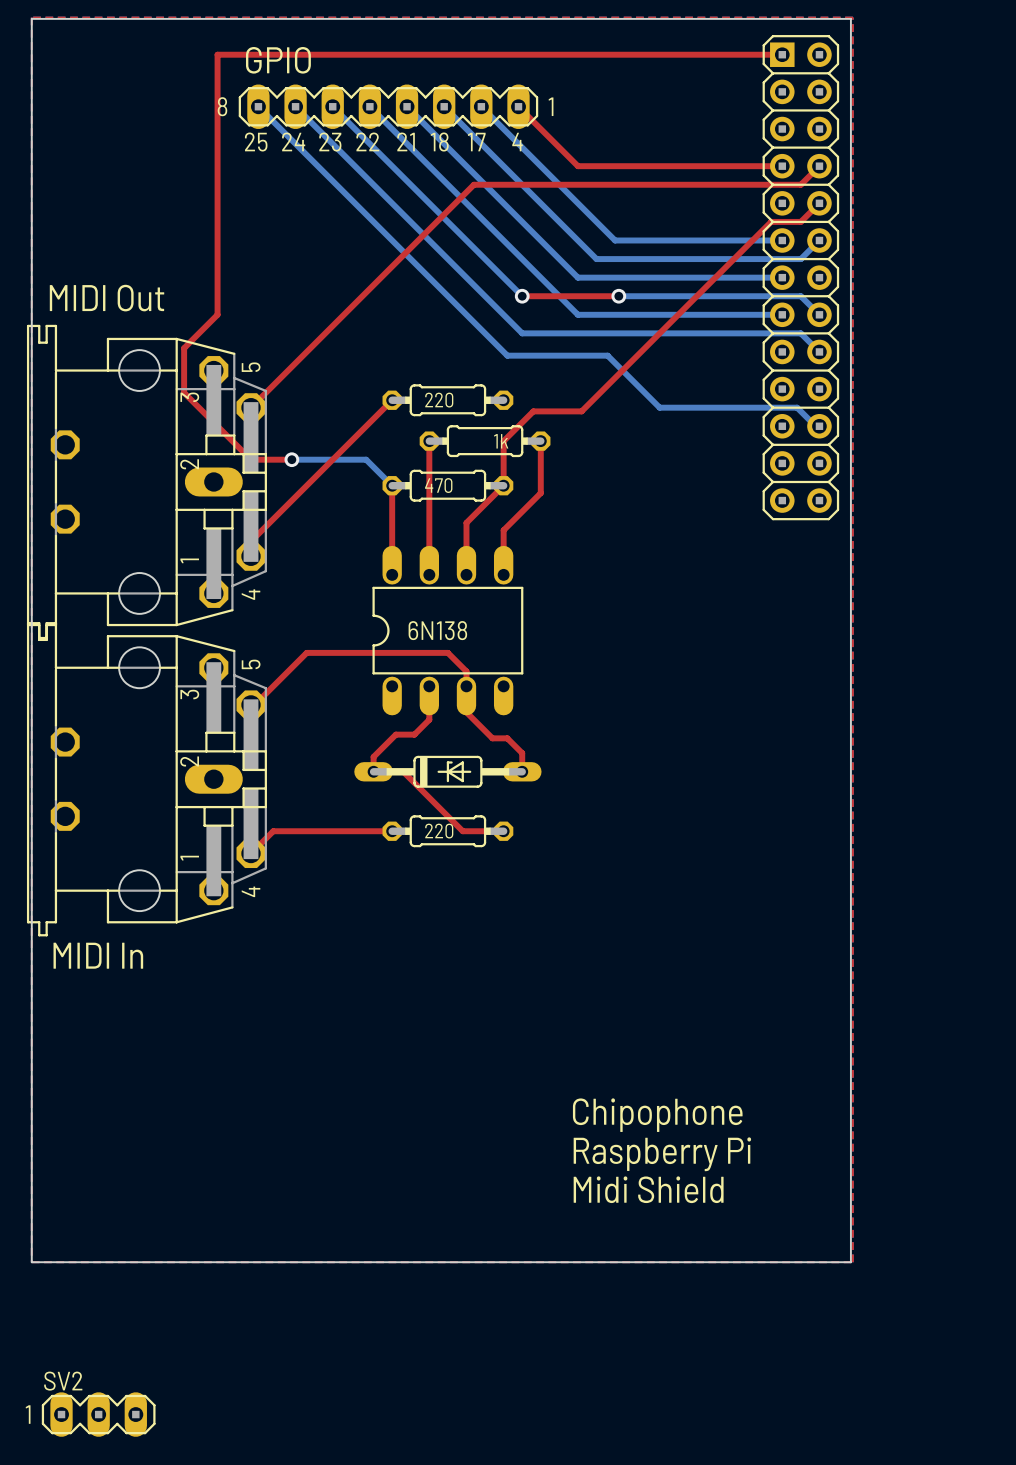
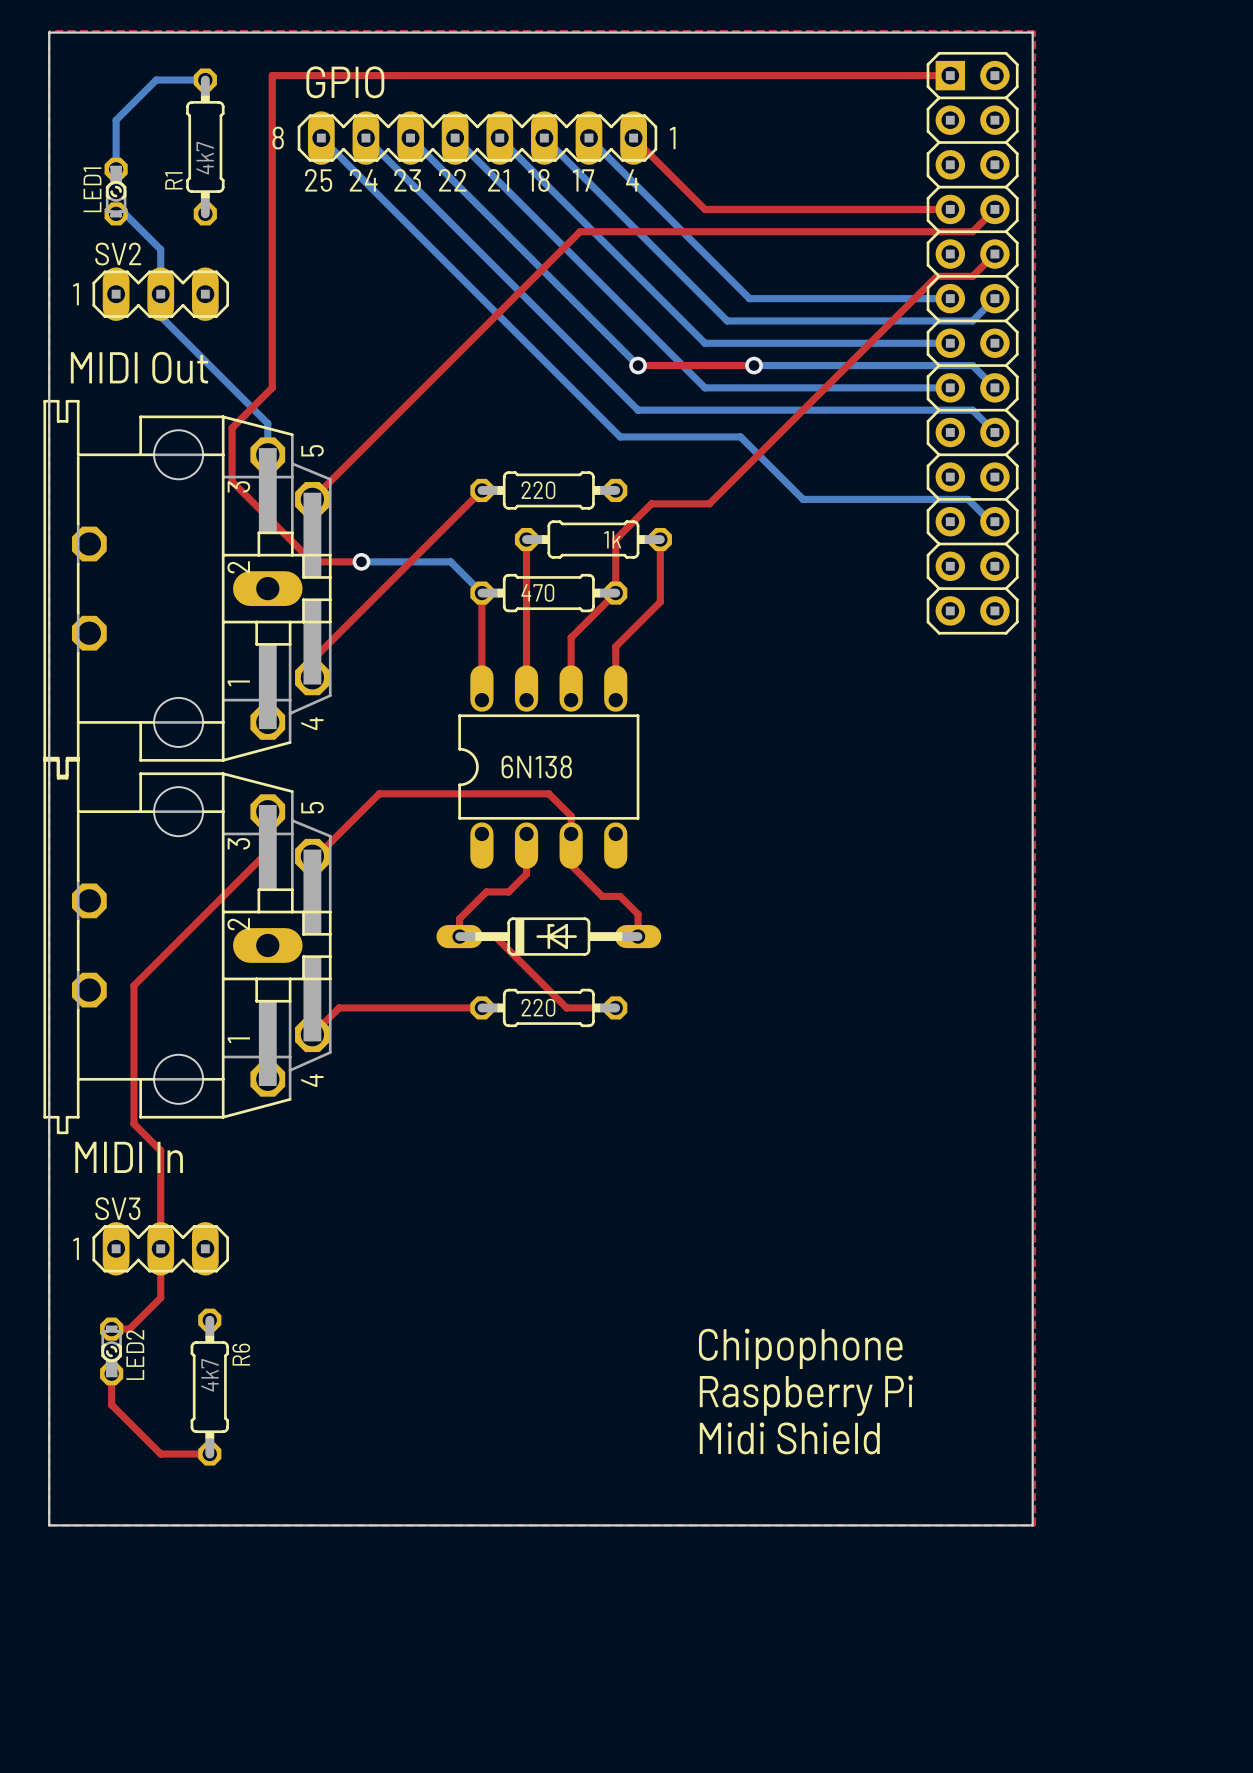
bottom track: none -> (205, 80) (156, 80) (116, 120) (116, 169)
R1: none -> 4k7 (205, 146)
LED1: none -> (116, 191)
bottom track: none -> (116, 213) (125, 213) (160, 249) (160, 316) (267, 423) (267, 459)
top track: none -> (267, 798) (267, 851) (133, 985) (133, 1123) (160, 1150) (160, 1297) (129, 1329) (107, 1329)
SV3: none -> (160, 1248)
LED2: none -> (111, 1351)
top track: none -> (111, 1378) (111, 1404) (160, 1454) (209, 1454)
R6: none -> 4k7 (209, 1387)
SV2 position: (98, 1414) -> (160, 294)

